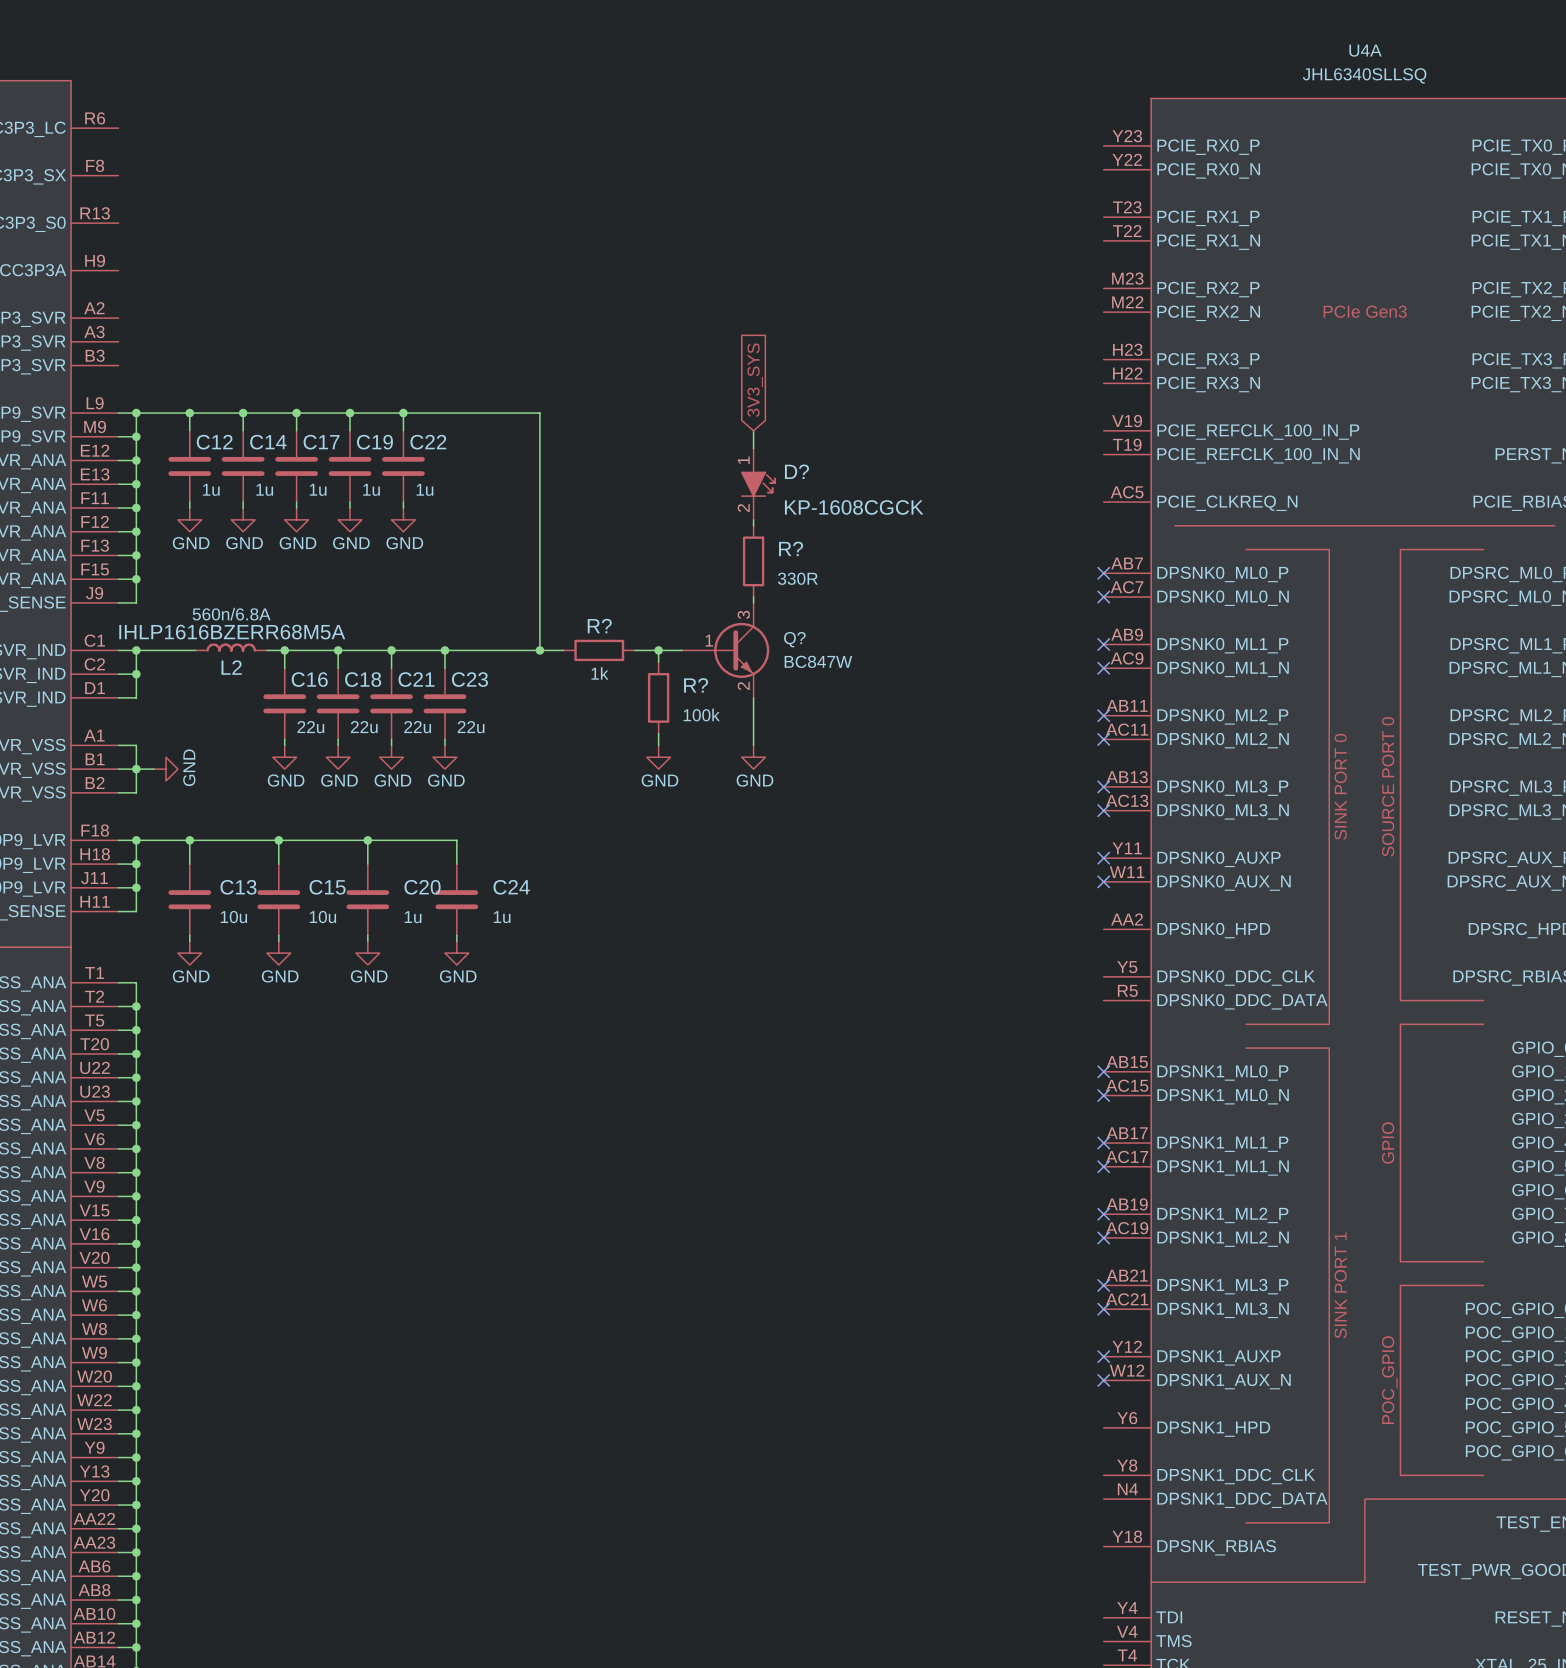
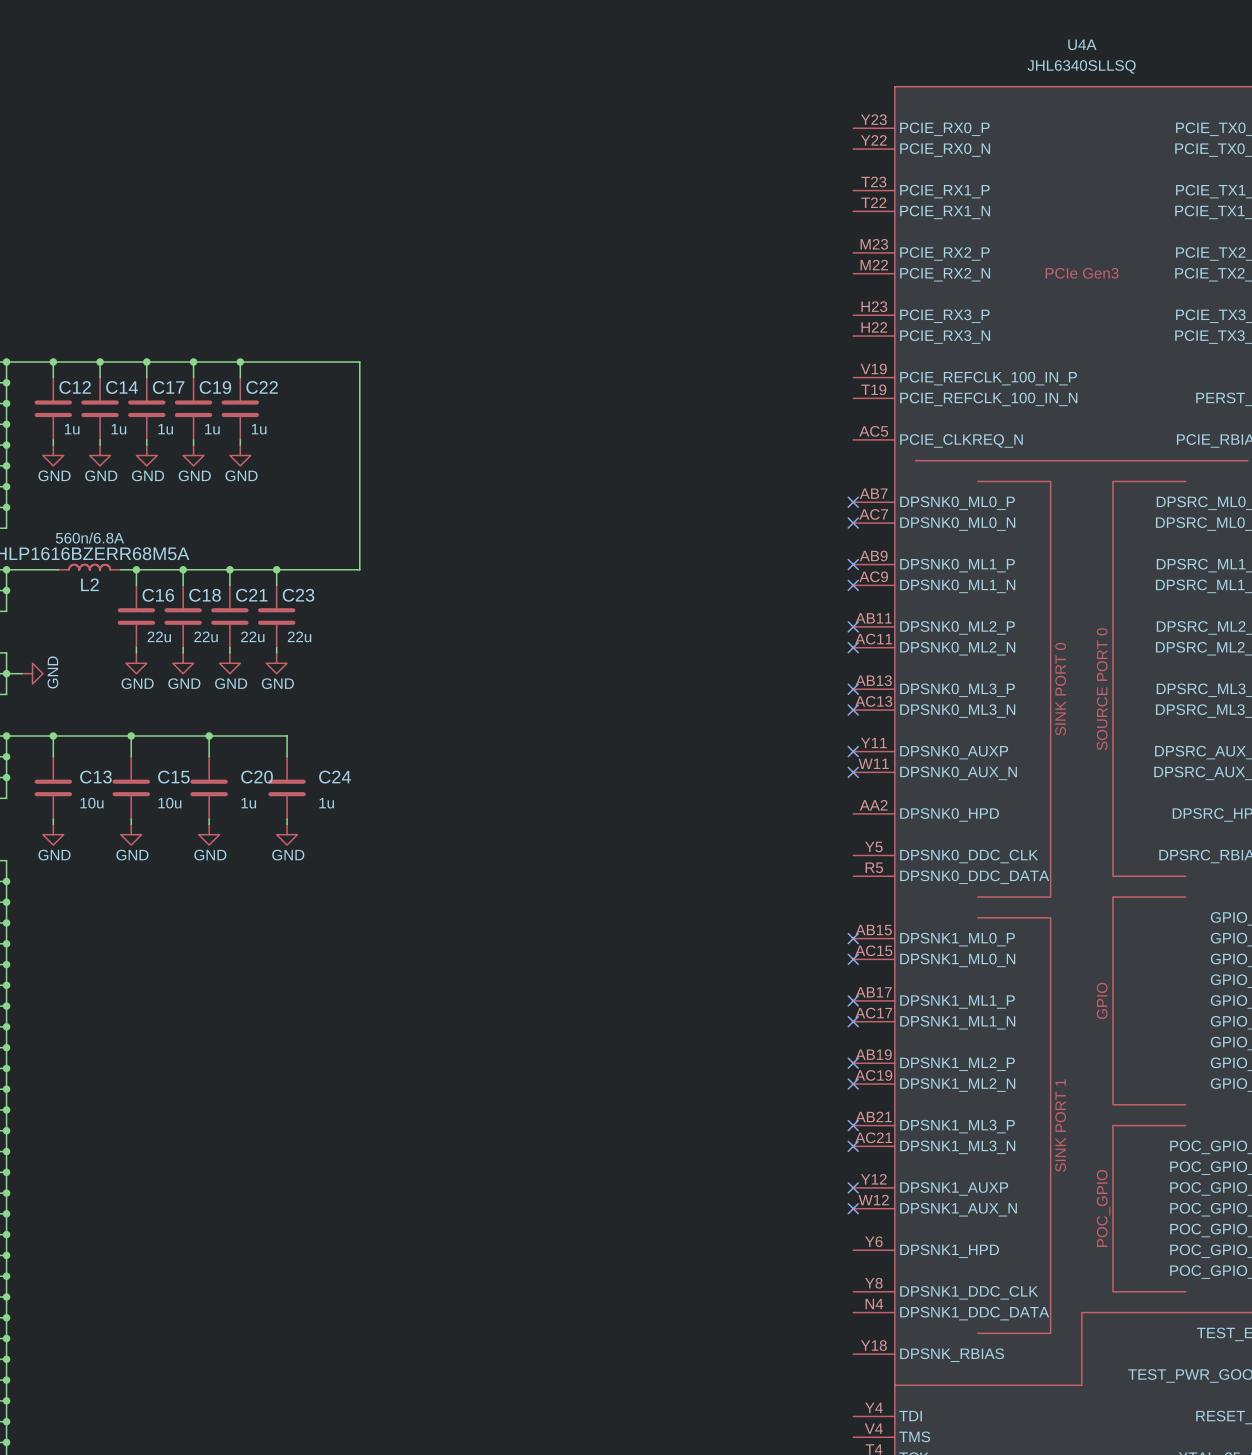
global label: 3V3_SYS (755, 380) -> none
wire: (753, 430) (753, 448) -> none
D?: KP-1608CGCK (758, 484) -> none
wire: (753, 519) (753, 525) -> none
R?: (753, 561) -> none
wire: (753, 597) (753, 602) -> none
wire: (539, 650) (563, 650) -> none
junction: (539, 650) -> none
R?: (599, 650) -> none
wire: (634, 650) (682, 650) -> none
wire: (658, 650) (658, 662) -> none
junction: (658, 650) -> none
Q?: BC847W (725, 650) -> none
R?: (658, 697) -> none
wire: (753, 697) (753, 745) -> none
wire: (658, 733) (658, 745) -> none
power symbol: GND (658, 757) -> none
power symbol: GND (753, 757) -> none

